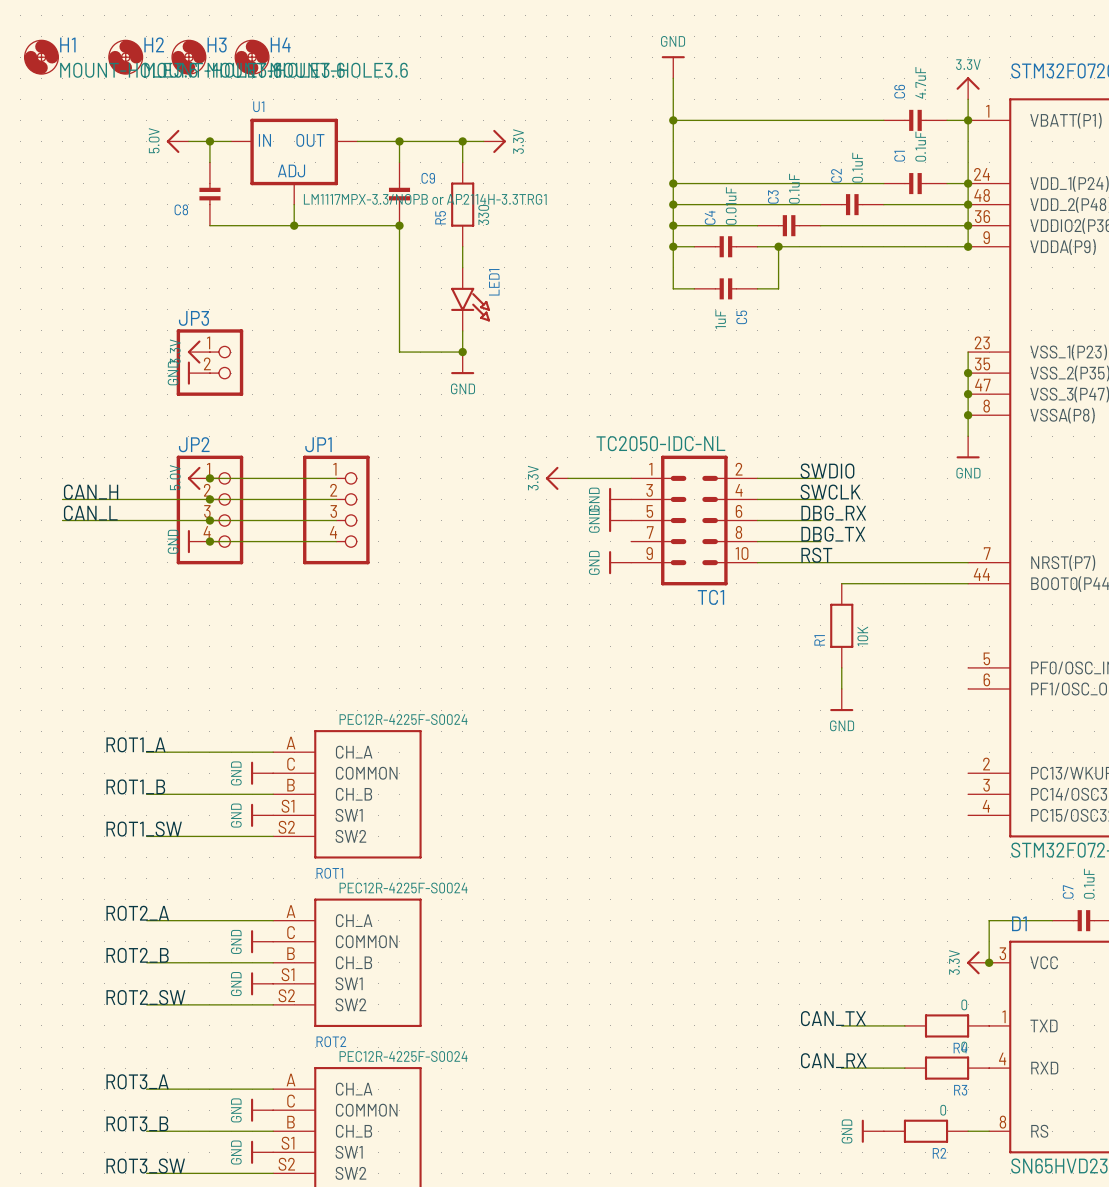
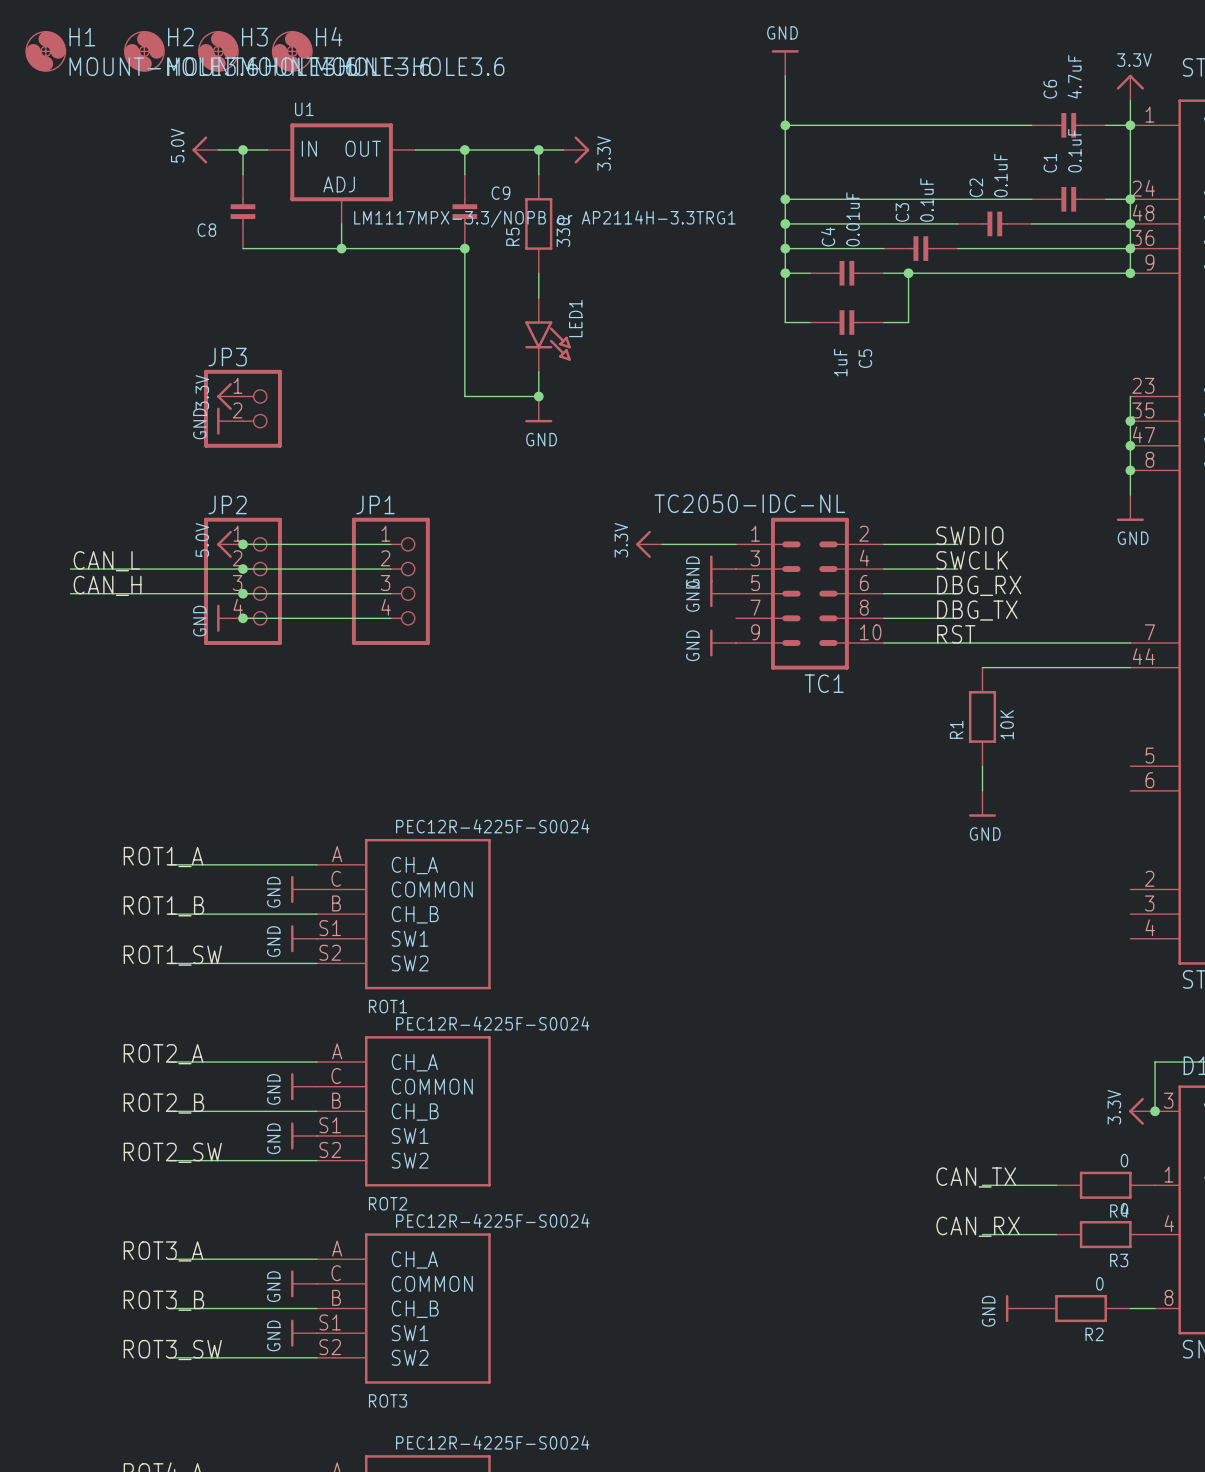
label: CAN_H (91, 492) -> CAN_L (106, 561)
label: CAN_L (90, 513) -> CAN_H (107, 585)

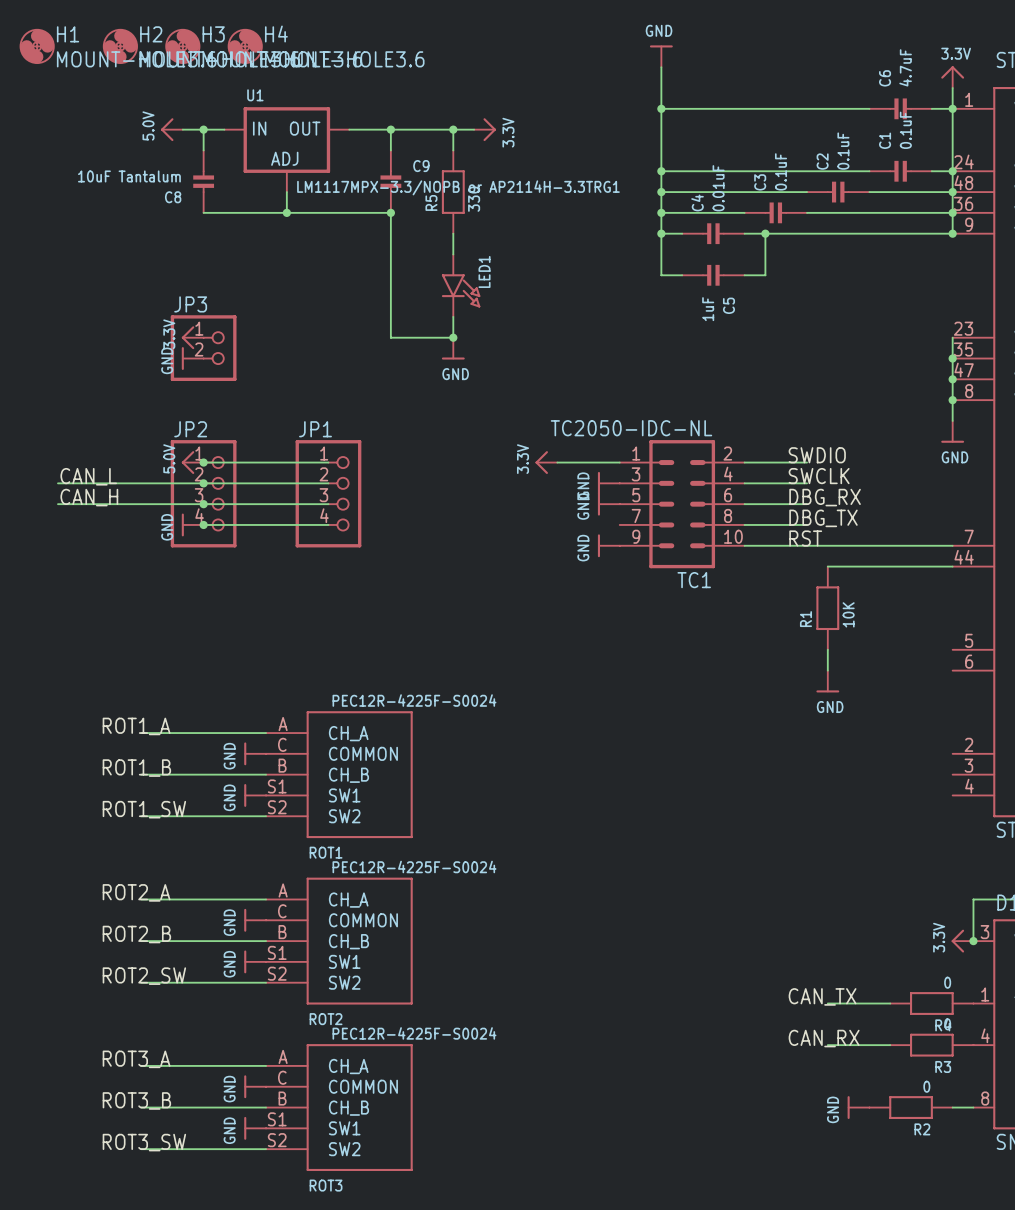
C8 value: none -> 10uF Tantalum (129, 176)

